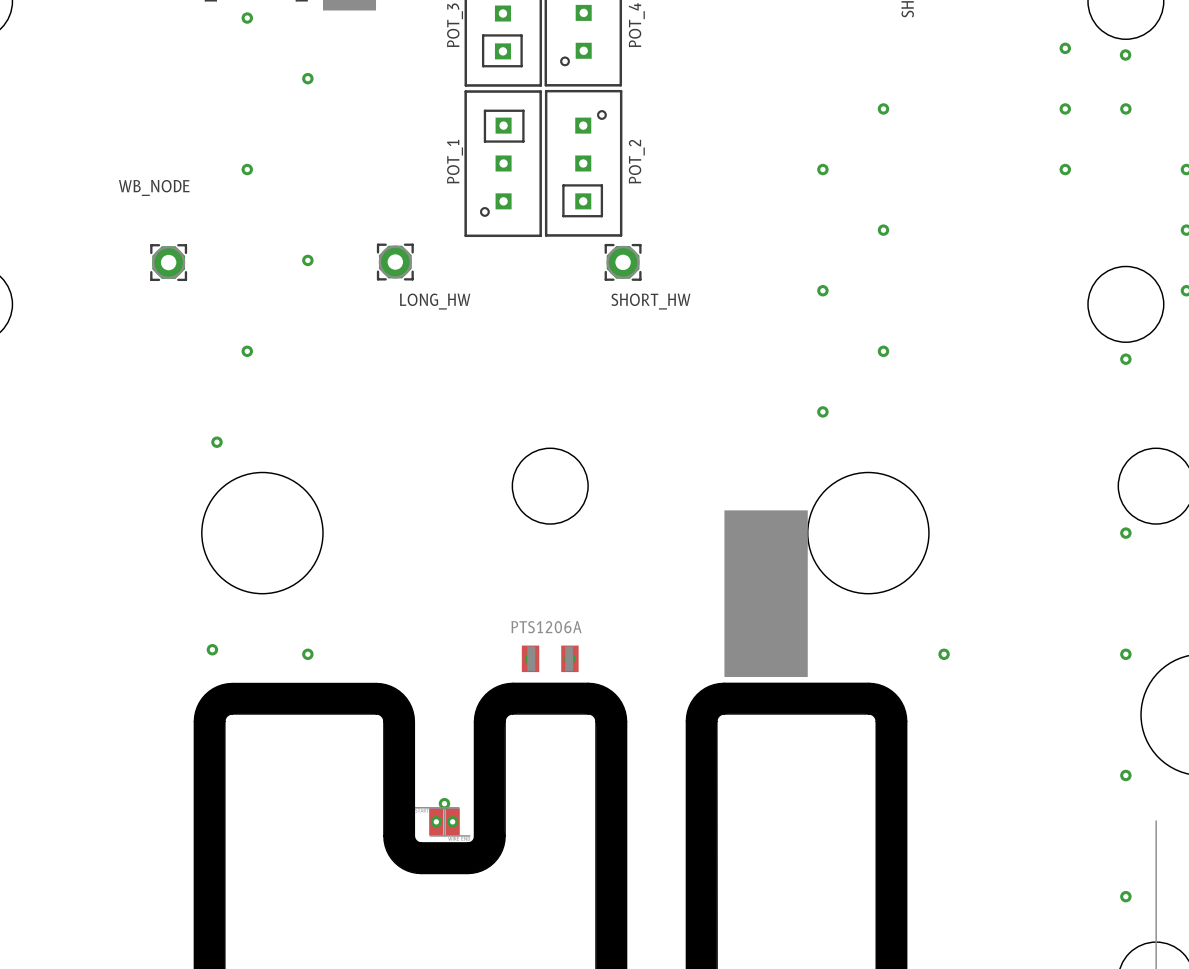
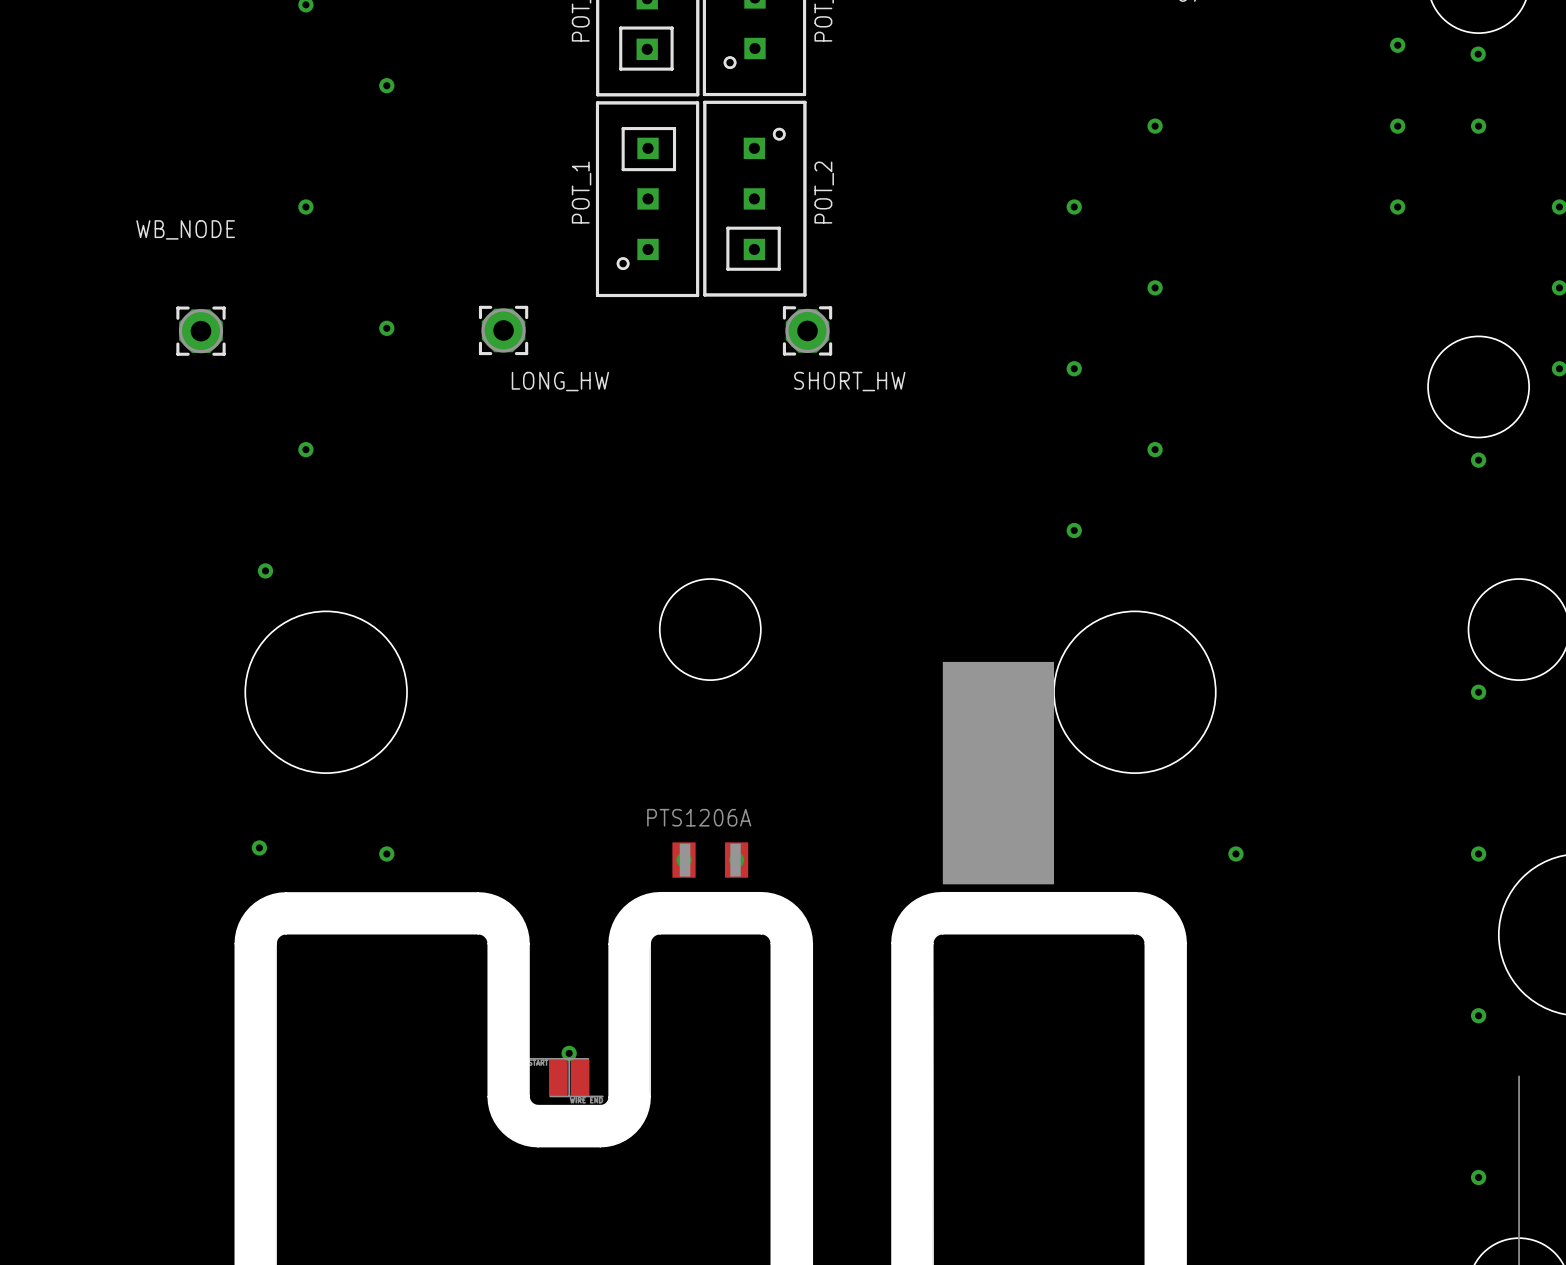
via: (436, 821) -> none
via: (452, 821) -> none

